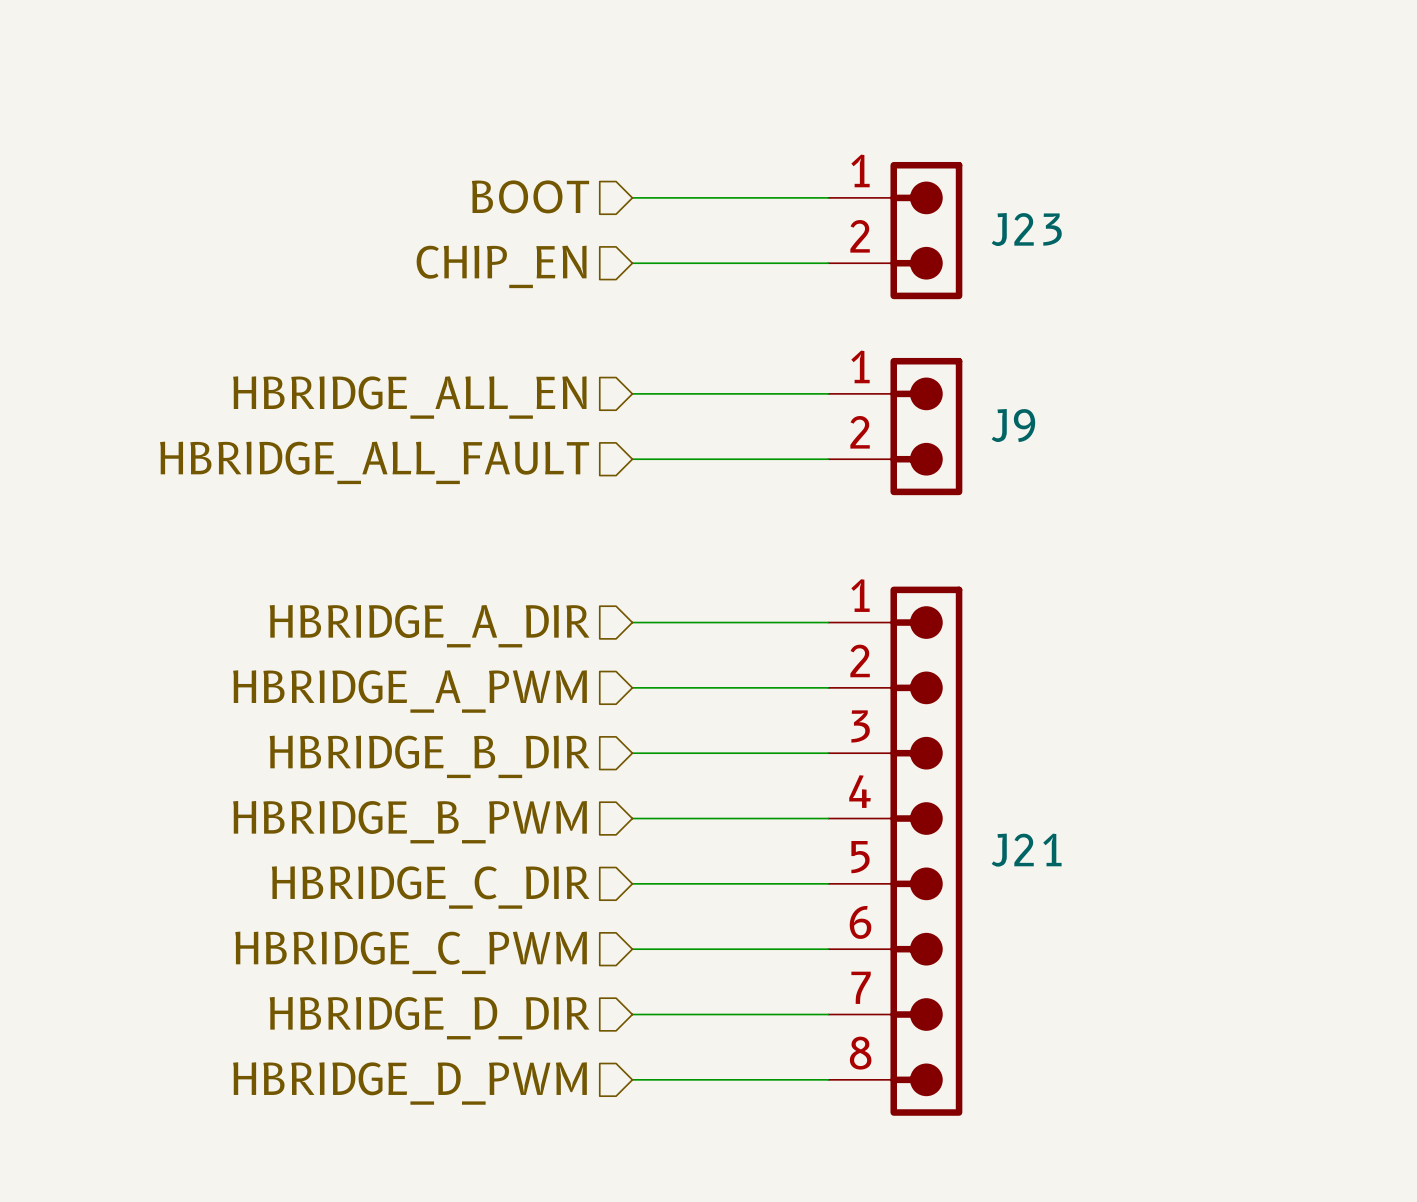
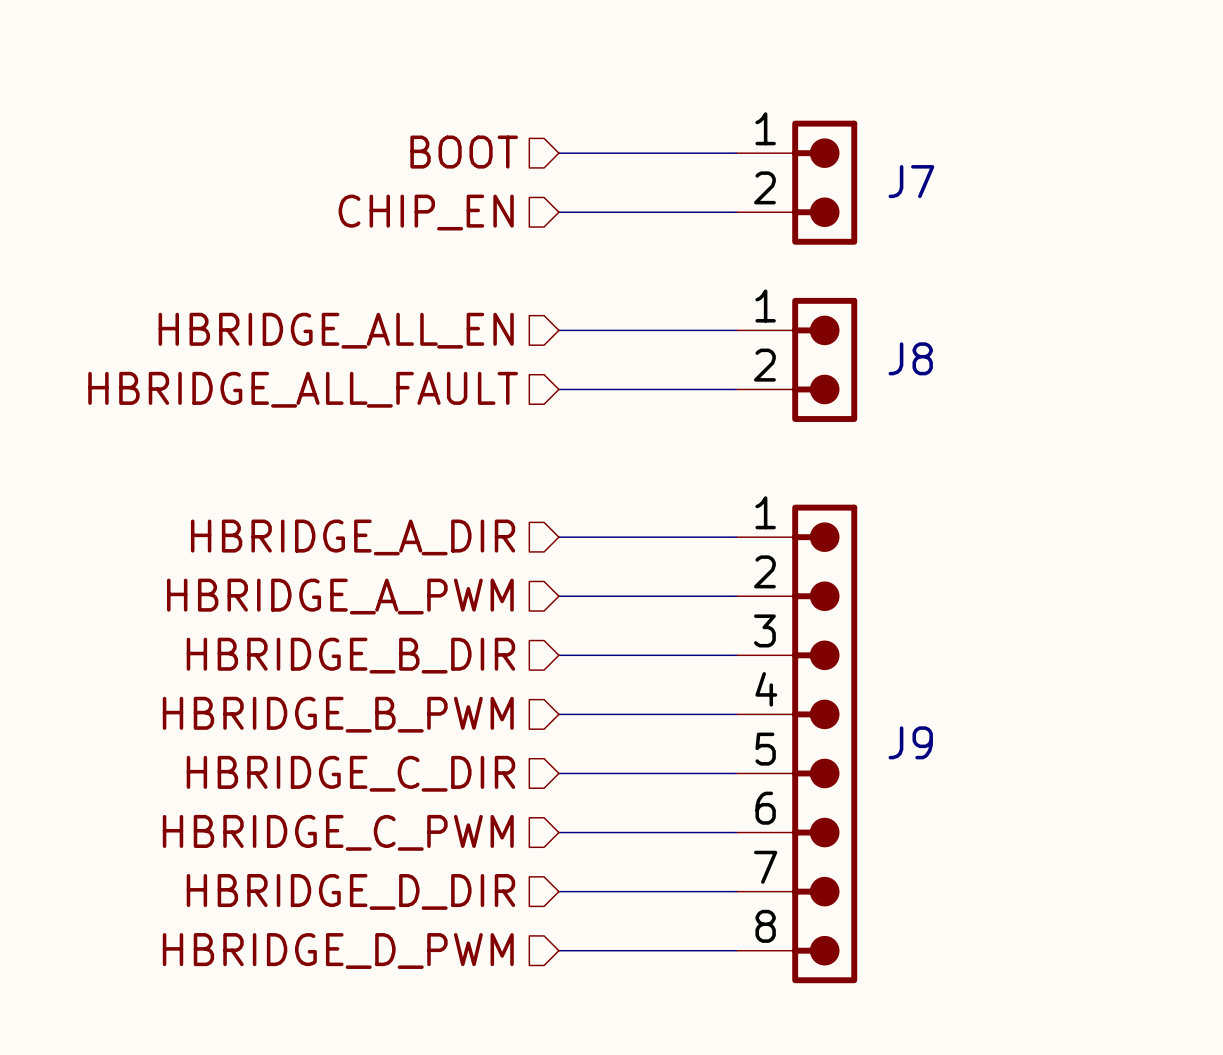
J23 name: J23 (1026, 229) -> J7 (911, 181)
J9 name: J9 (1013, 425) -> J8 (910, 358)
J21 name: J21 (1026, 850) -> J9 (910, 742)

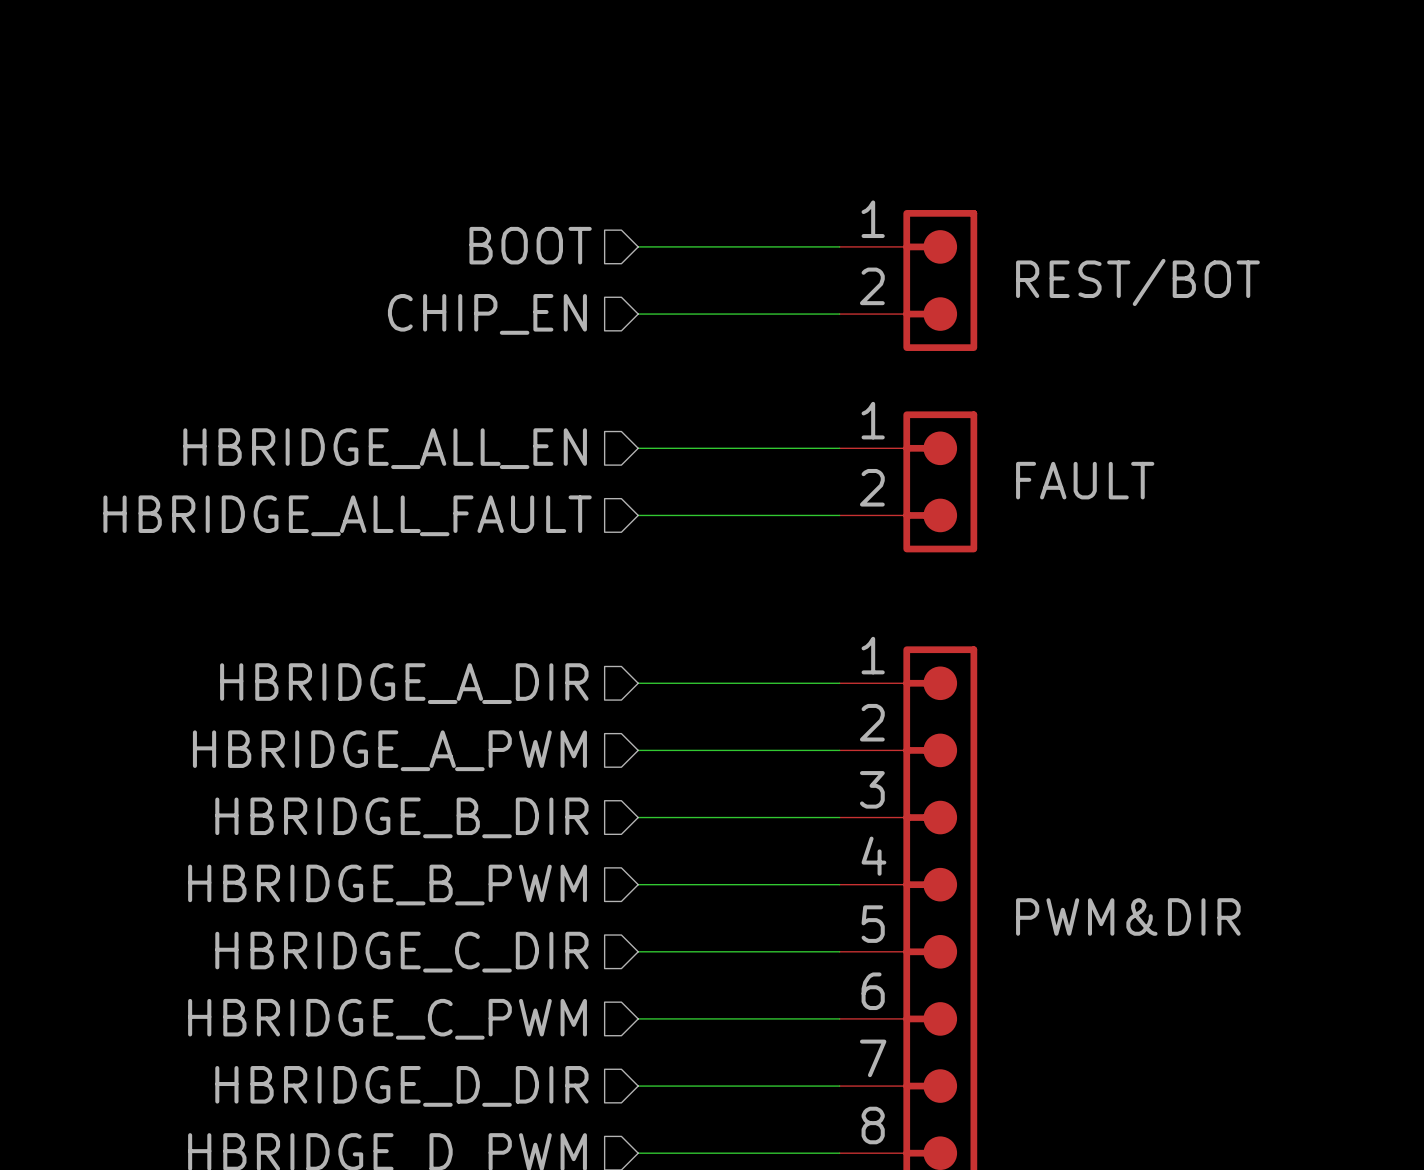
J7 name: J7 (911, 181) -> REST/BOT (1137, 282)
J8 name: J8 (910, 358) -> FAULT (1085, 480)
J9 name: J9 (910, 742) -> PWM&DIR (1128, 916)

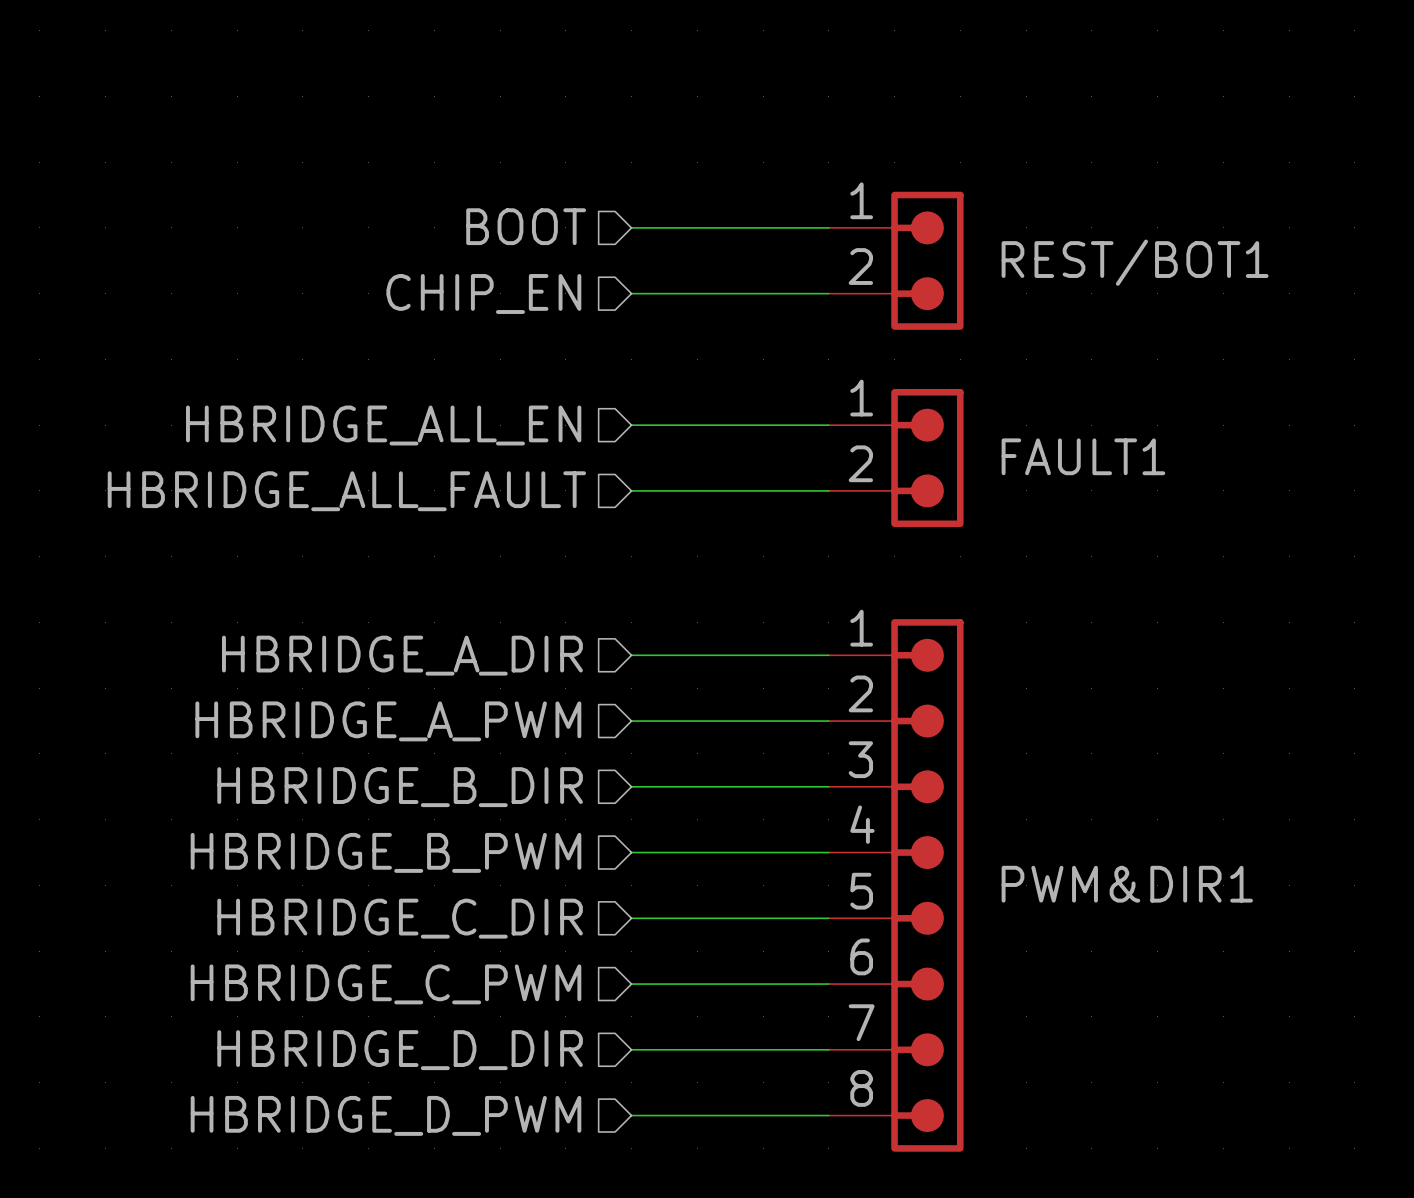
REST/BOT name: REST/BOT (1137, 282) -> REST/BOT1 (1135, 262)
FAULT name: FAULT (1085, 480) -> FAULT1 (1083, 456)
PWM&DIR name: PWM&DIR (1128, 916) -> PWM&DIR1 (1127, 884)

